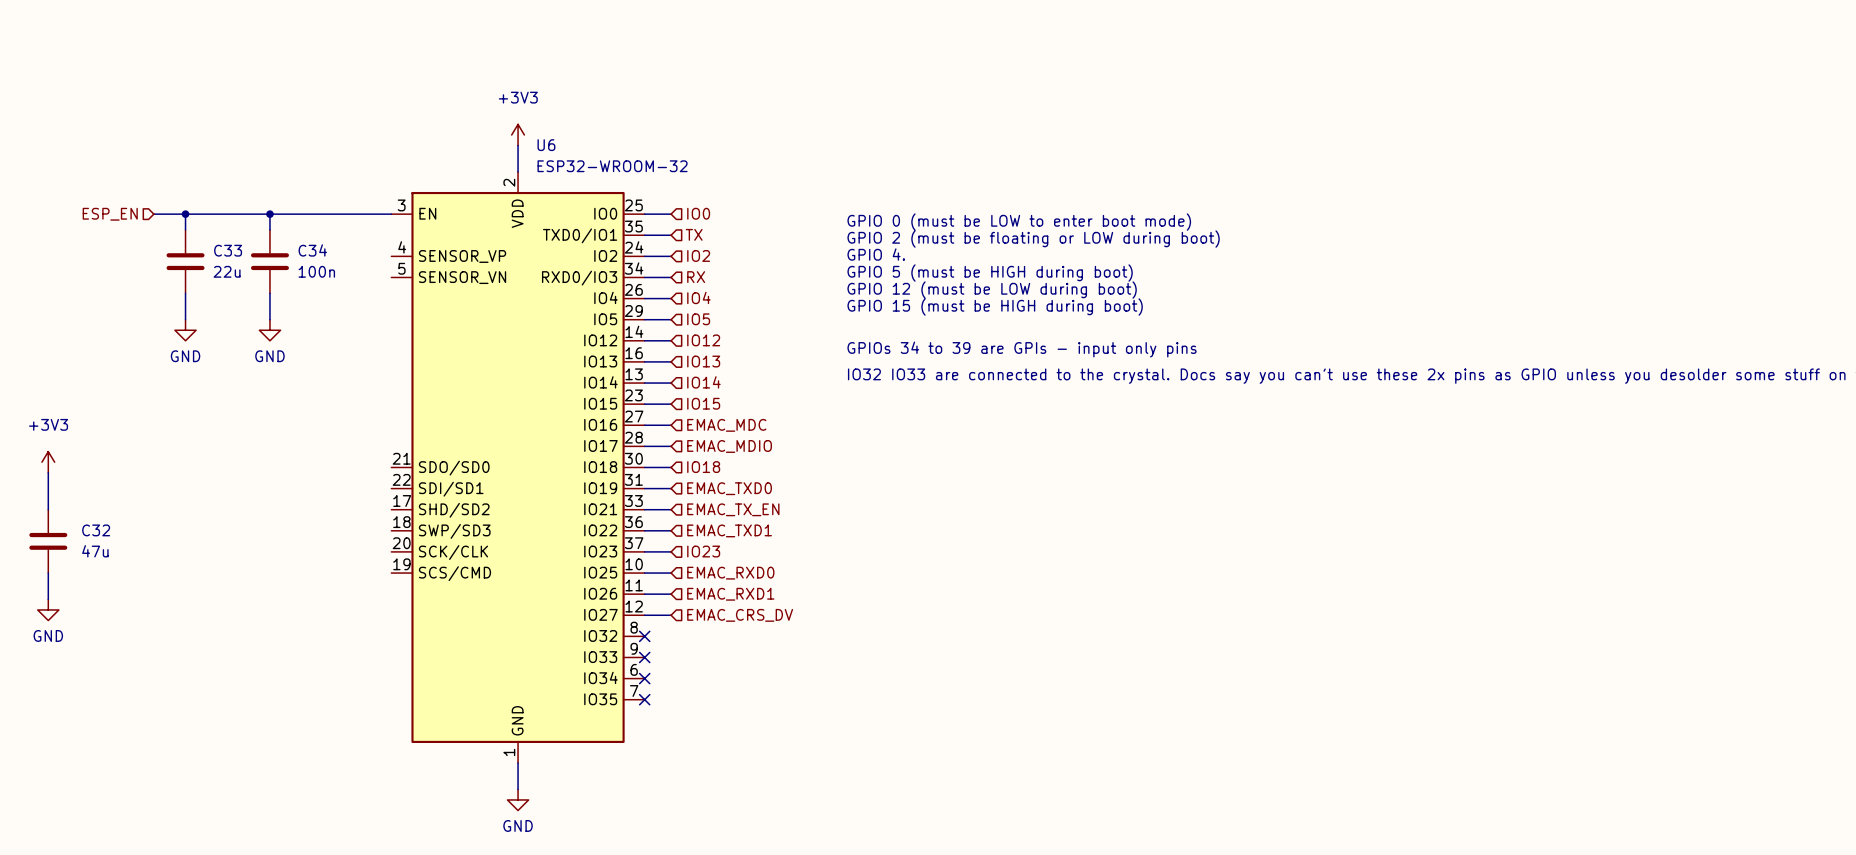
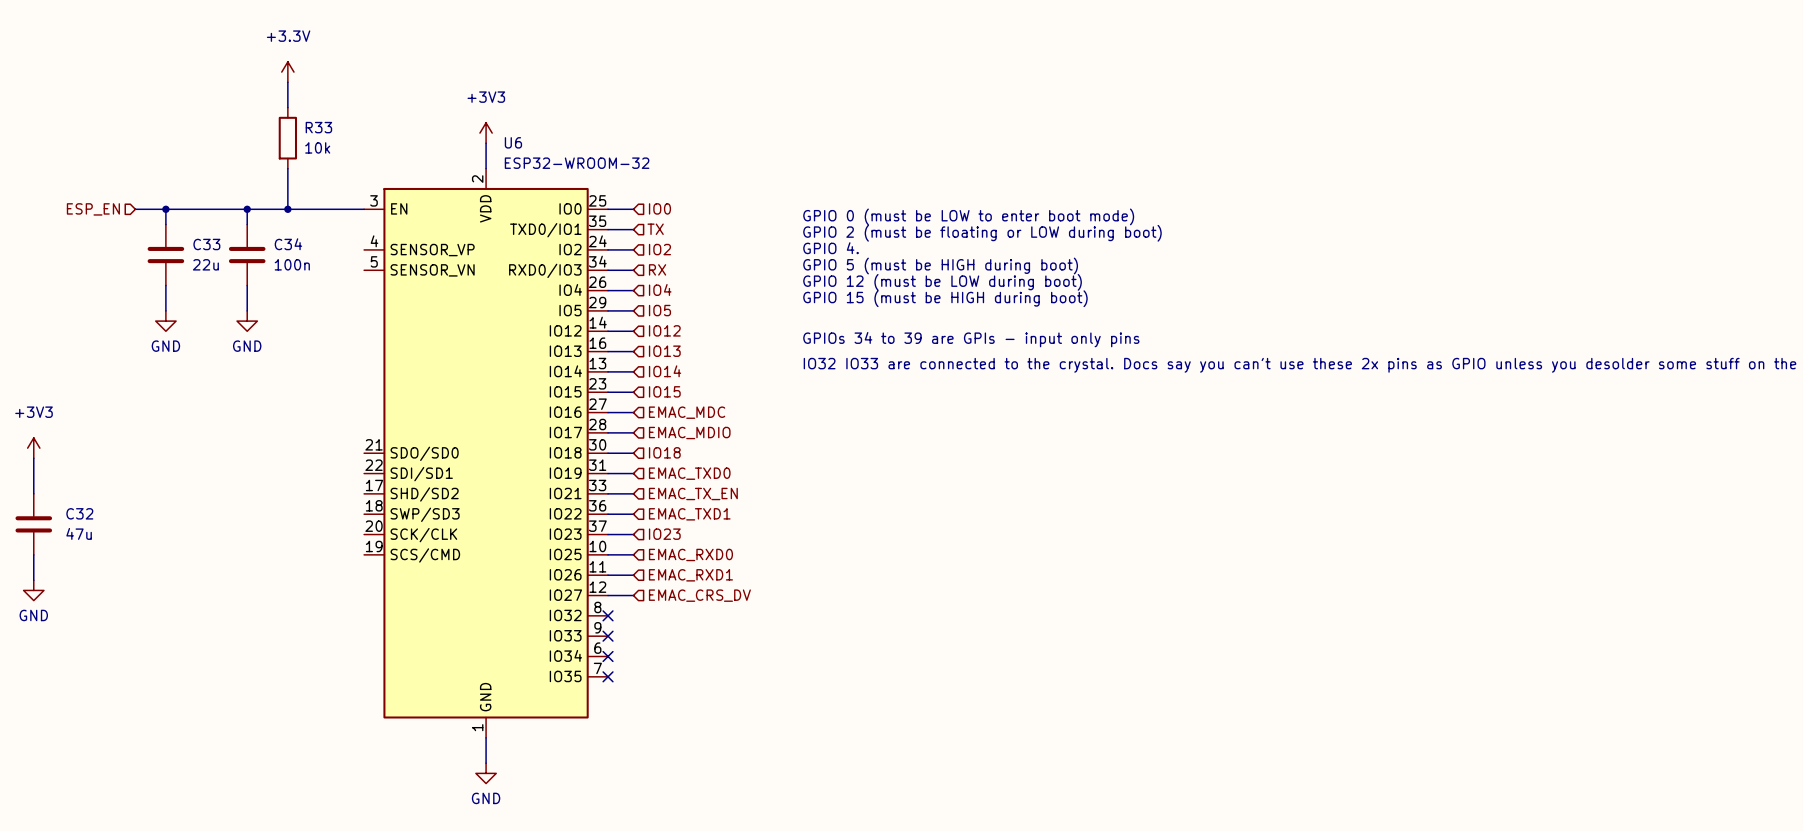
power symbol: none -> +3.3V (287, 72)
wire: none -> (287, 82) (287, 107)
R33: none -> 10k (287, 138)
wire: none -> (287, 168) (287, 209)
junction: none -> (287, 209)

